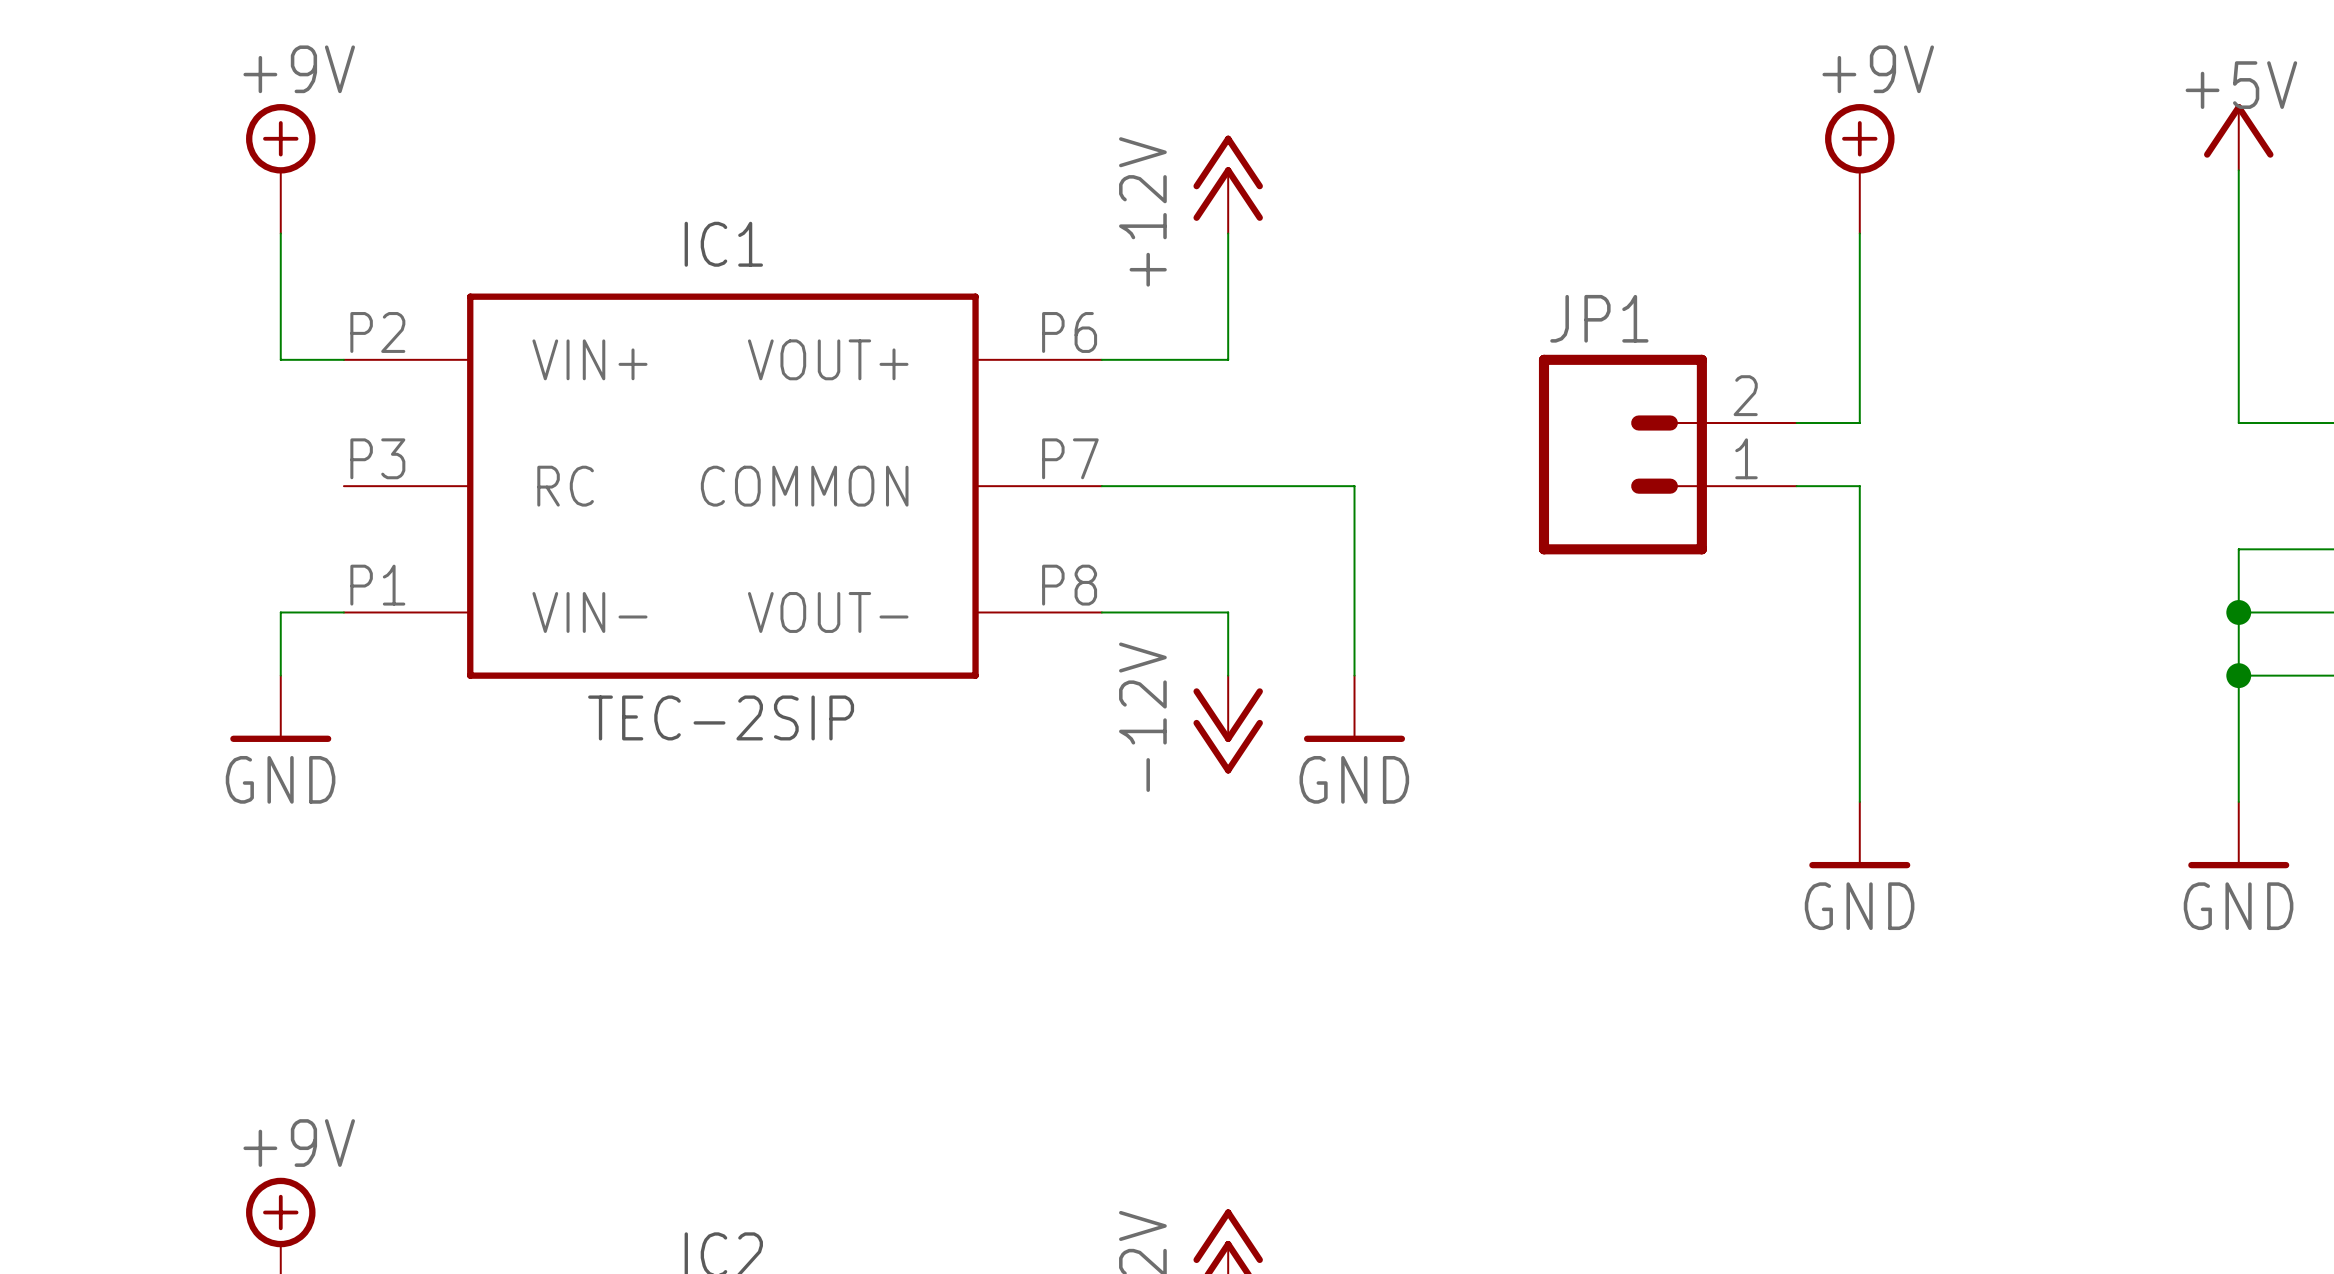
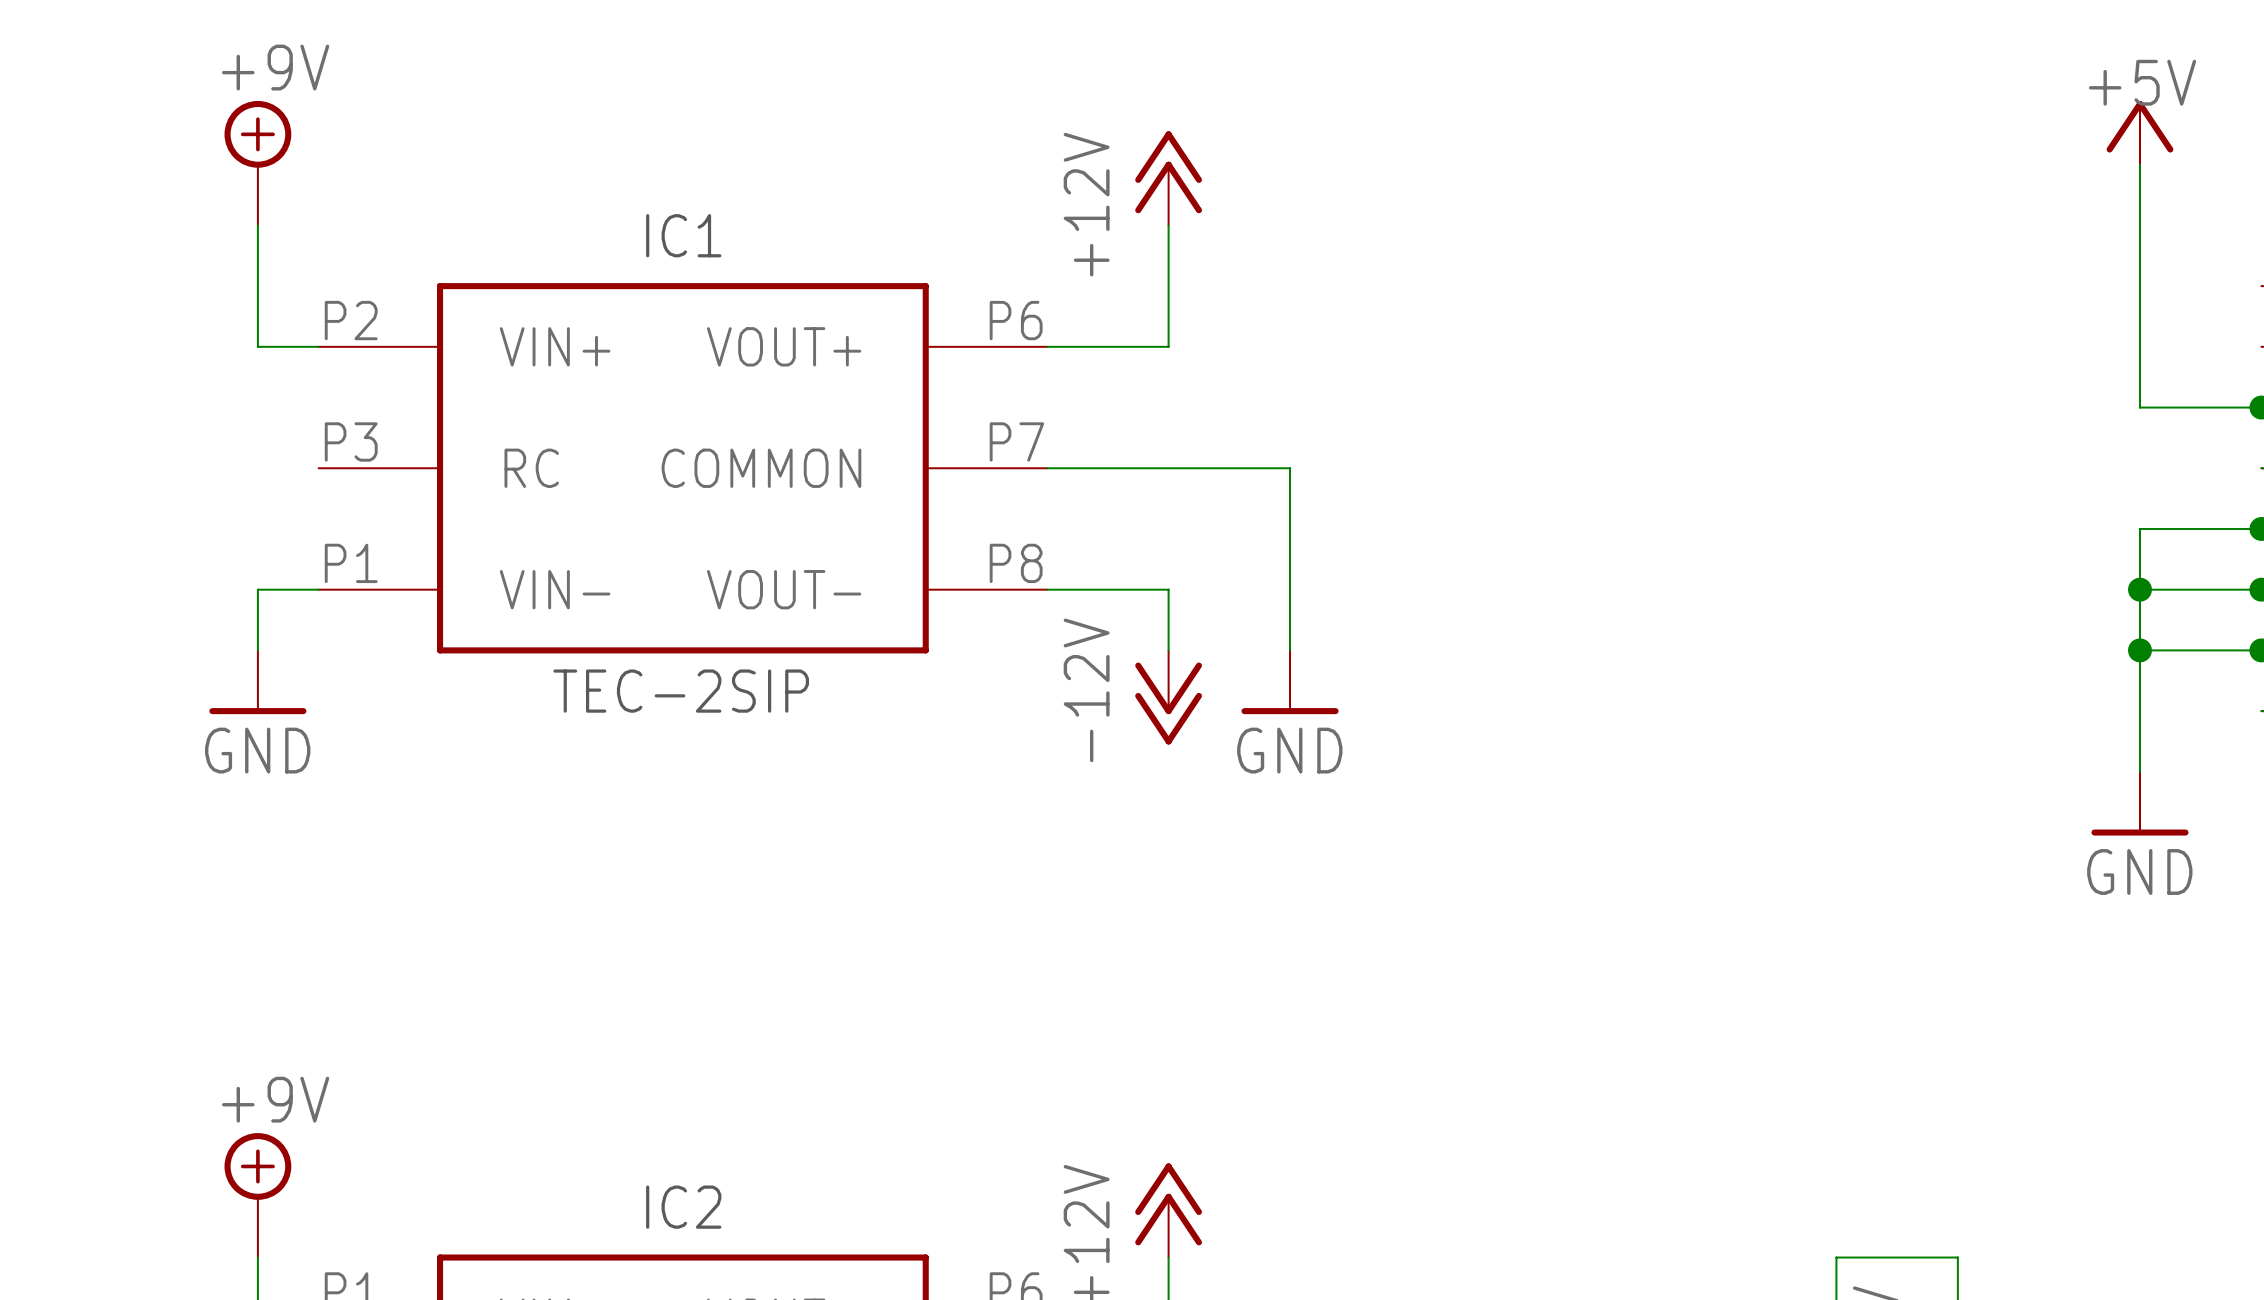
power symbol: +9V (1859, 168) -> none
wire: (1859, 233) (1859, 423) (1796, 423) -> none
JP1: (1667, 454) -> none
wire: (1796, 486) (1859, 486) (1859, 801) -> none
power symbol: GND (1859, 835) -> none

